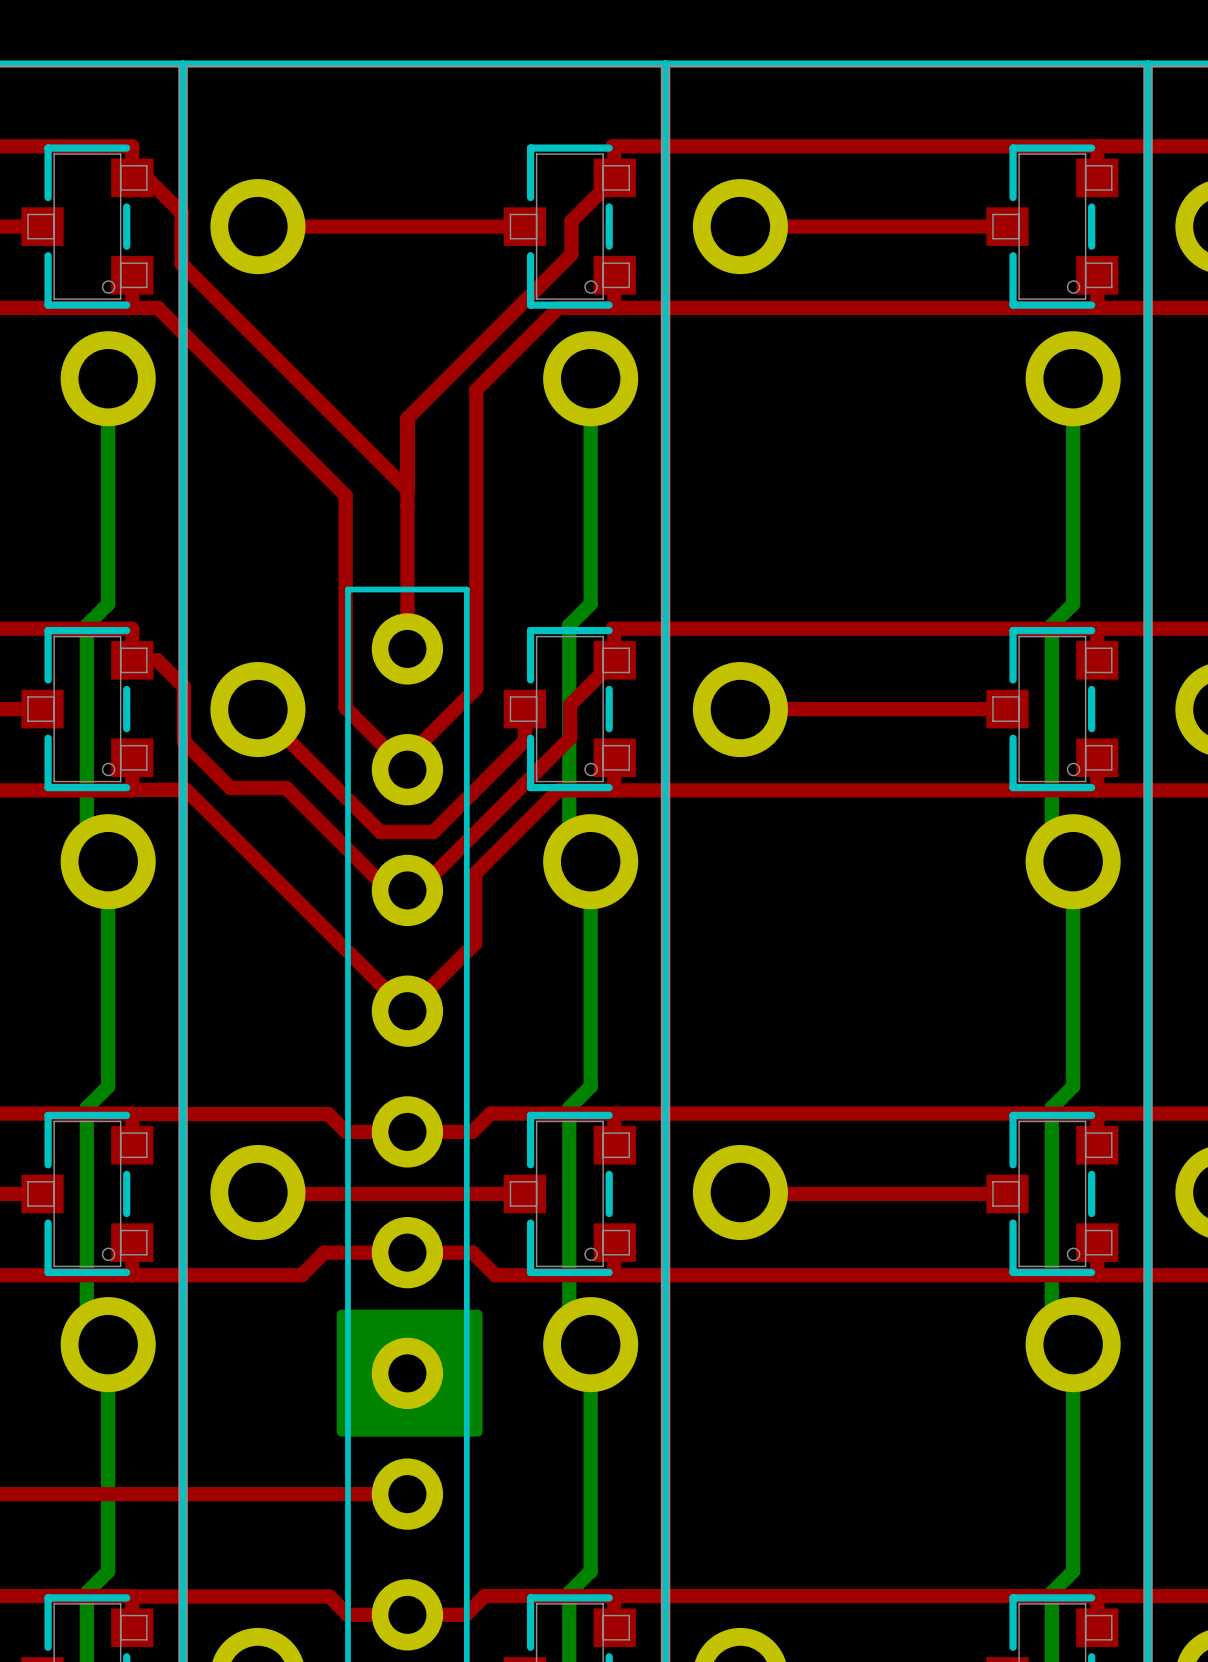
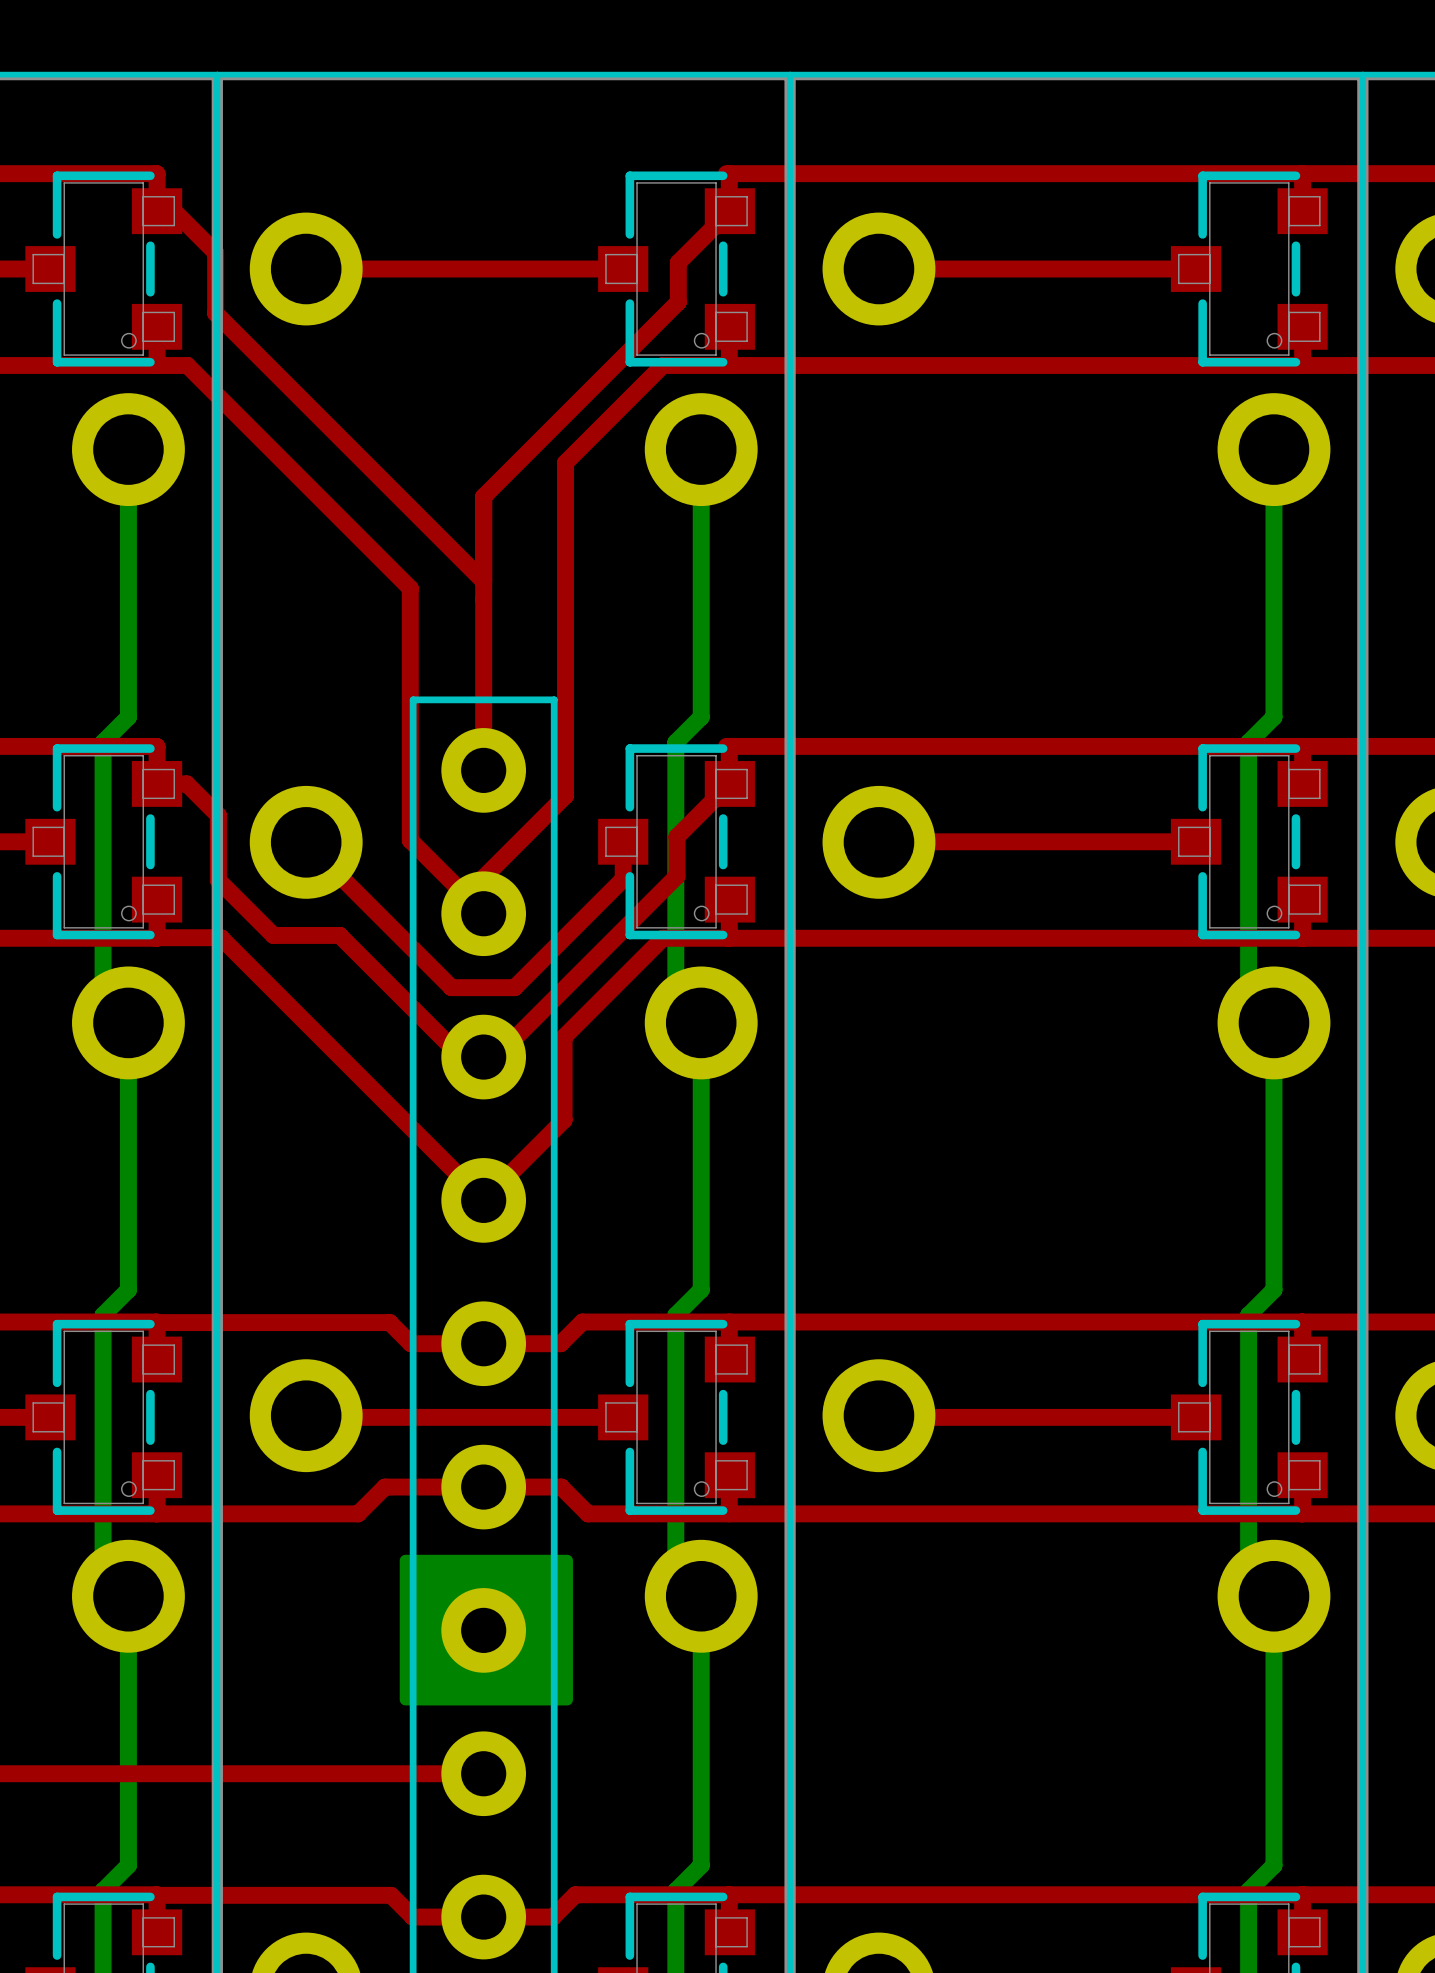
top track: (476, 670) (476, 688) (407, 757) -> (565, 795) (483, 877) (483, 898)

